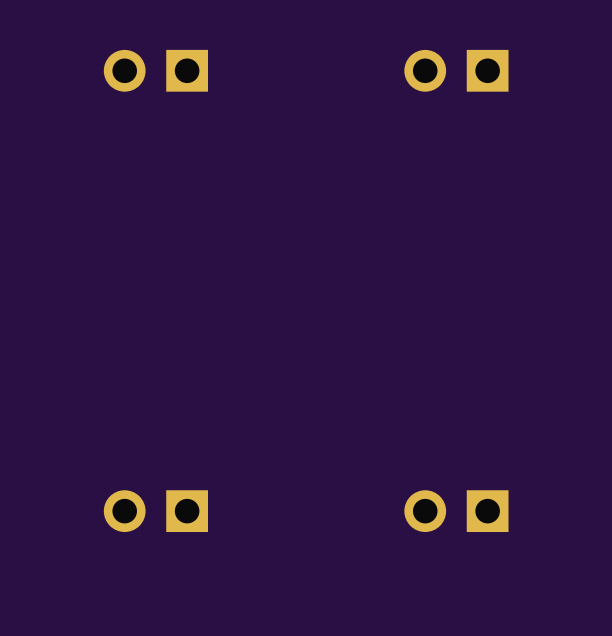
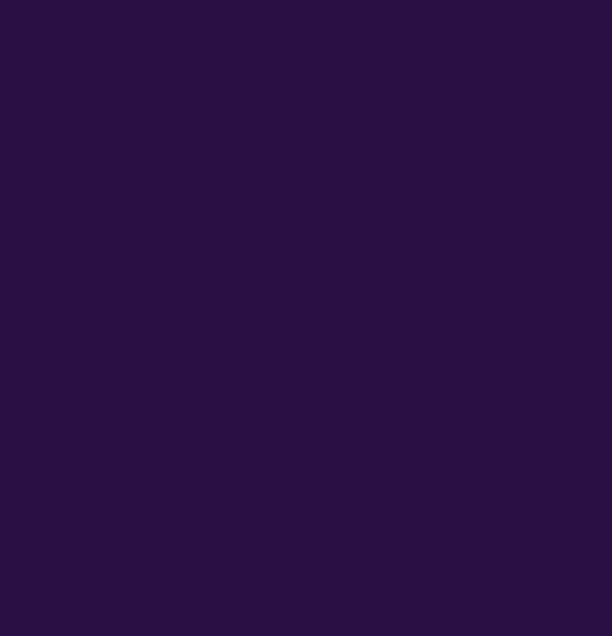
part: (155, 70) -> none
part: (456, 70) -> none
part: (155, 511) -> none
part: (456, 511) -> none

